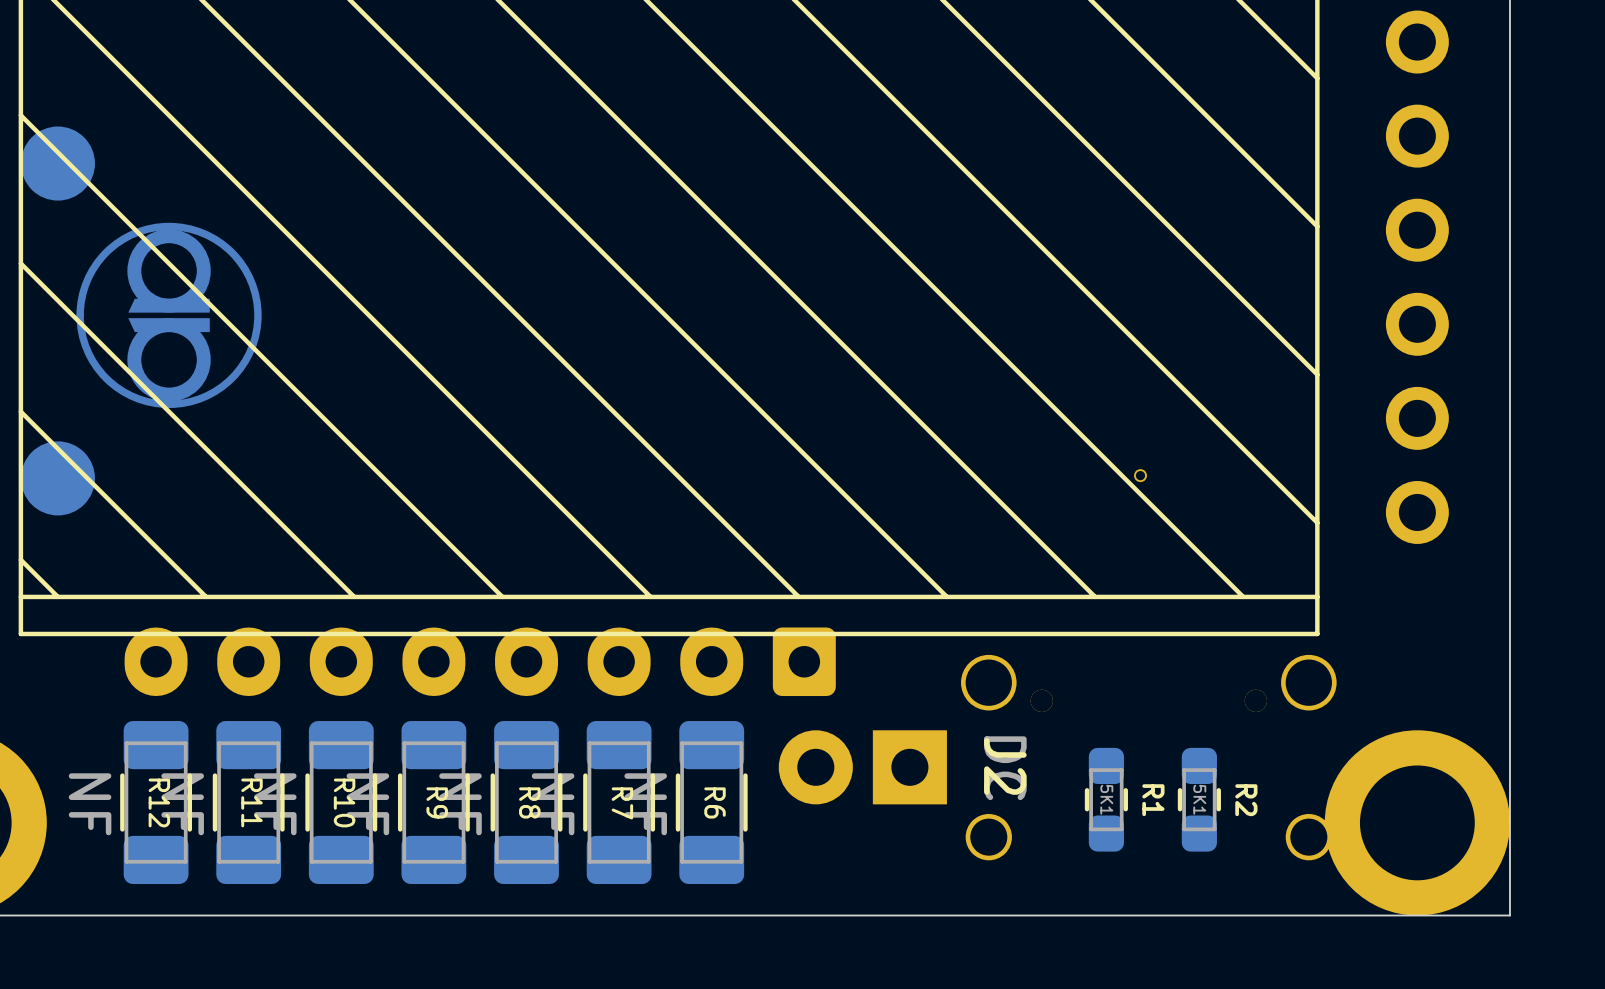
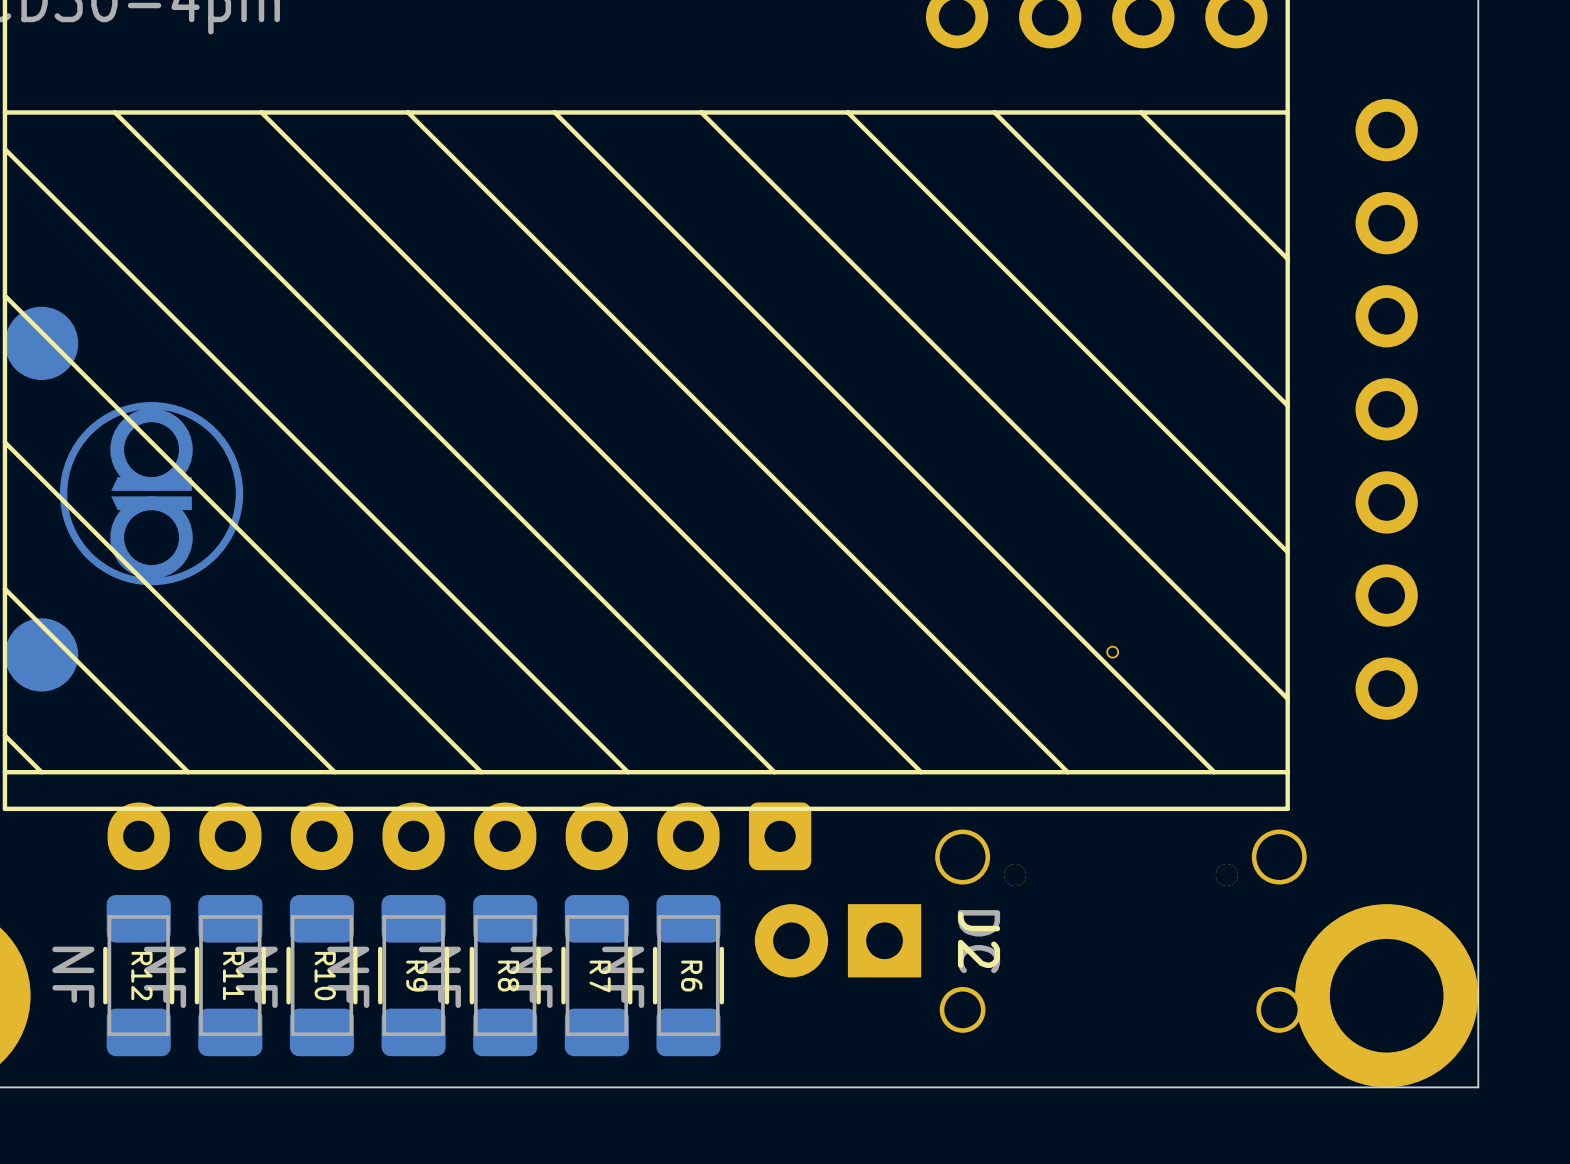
R1: 5K1 (1106, 799) -> none
R2: 5K1 (1199, 799) -> none

